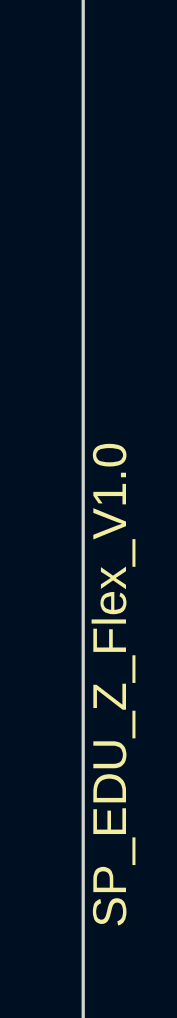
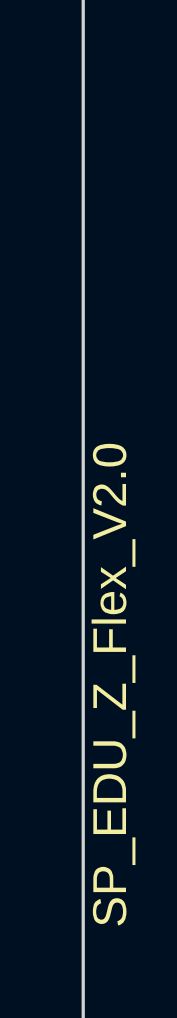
text: SP_EDU_Z_Flex_V1.0 (113, 684) -> SP_EDU_Z_Flex_V2.0 (113, 684)

